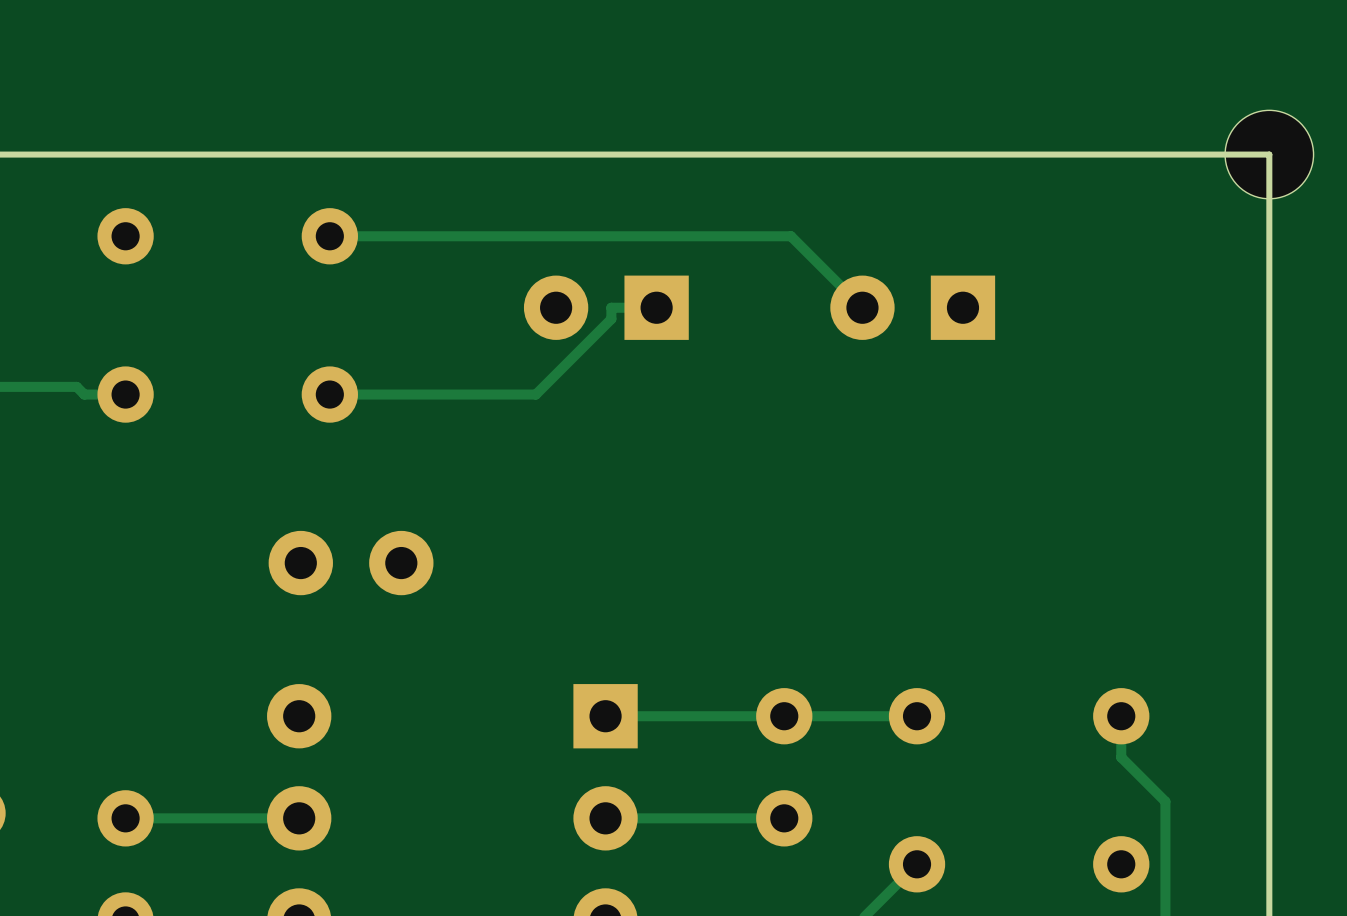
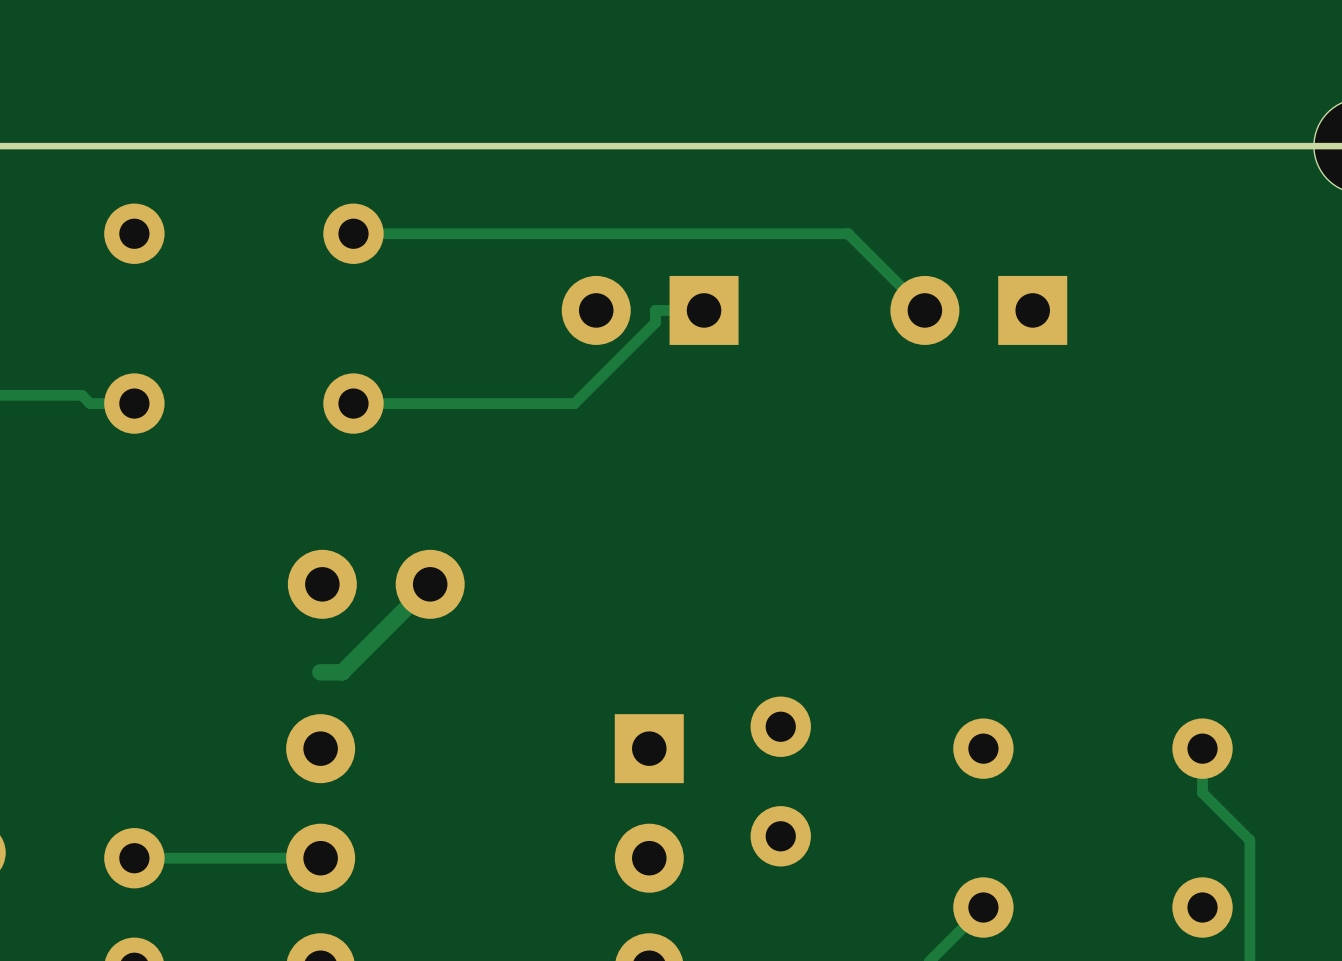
track: none -> (430, 584) (342, 672) (320, 672)
track: (917, 716) (605, 716) -> none
part position: (784, 767) -> (780, 781)
track: (784, 818) (605, 818) -> none

